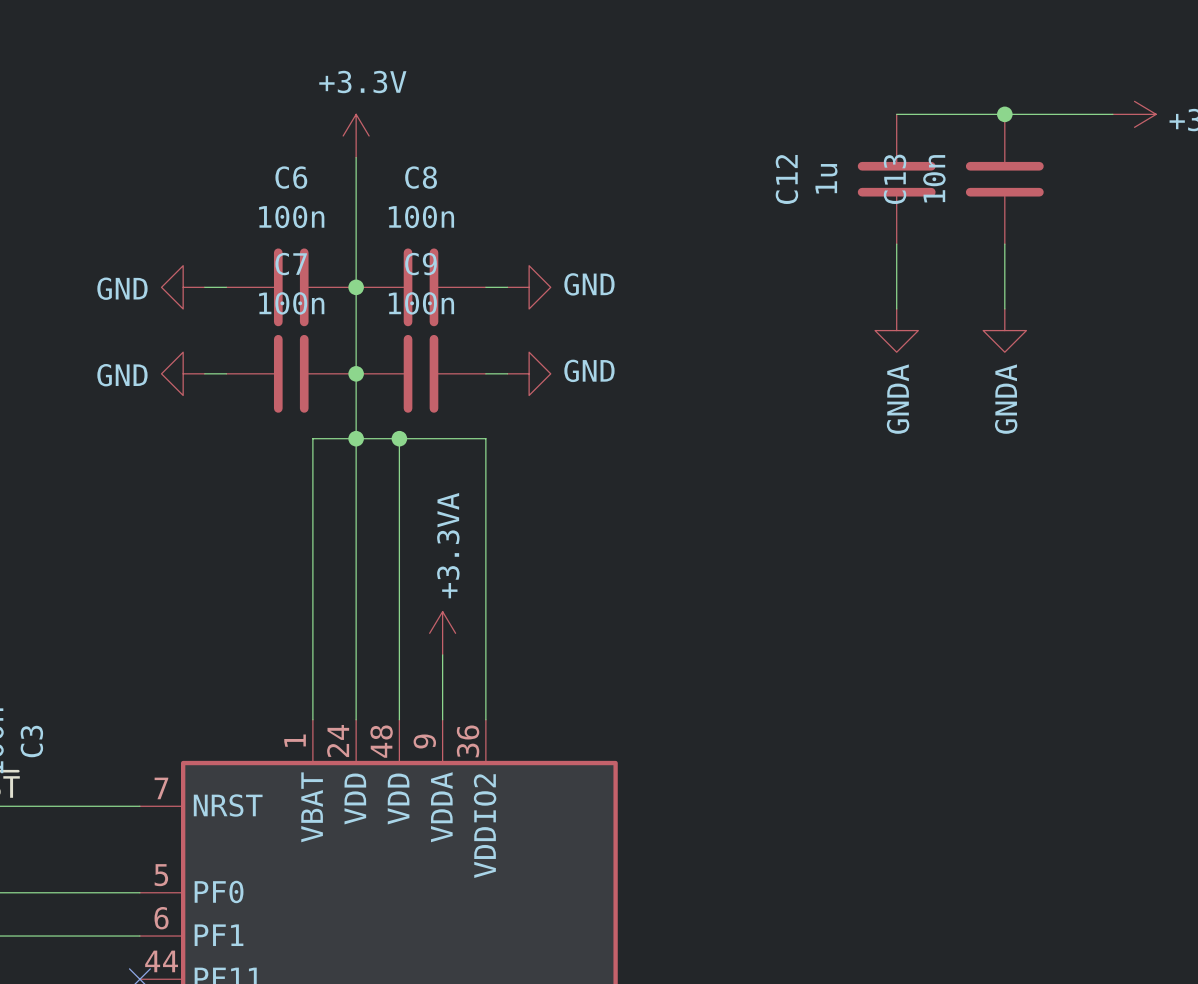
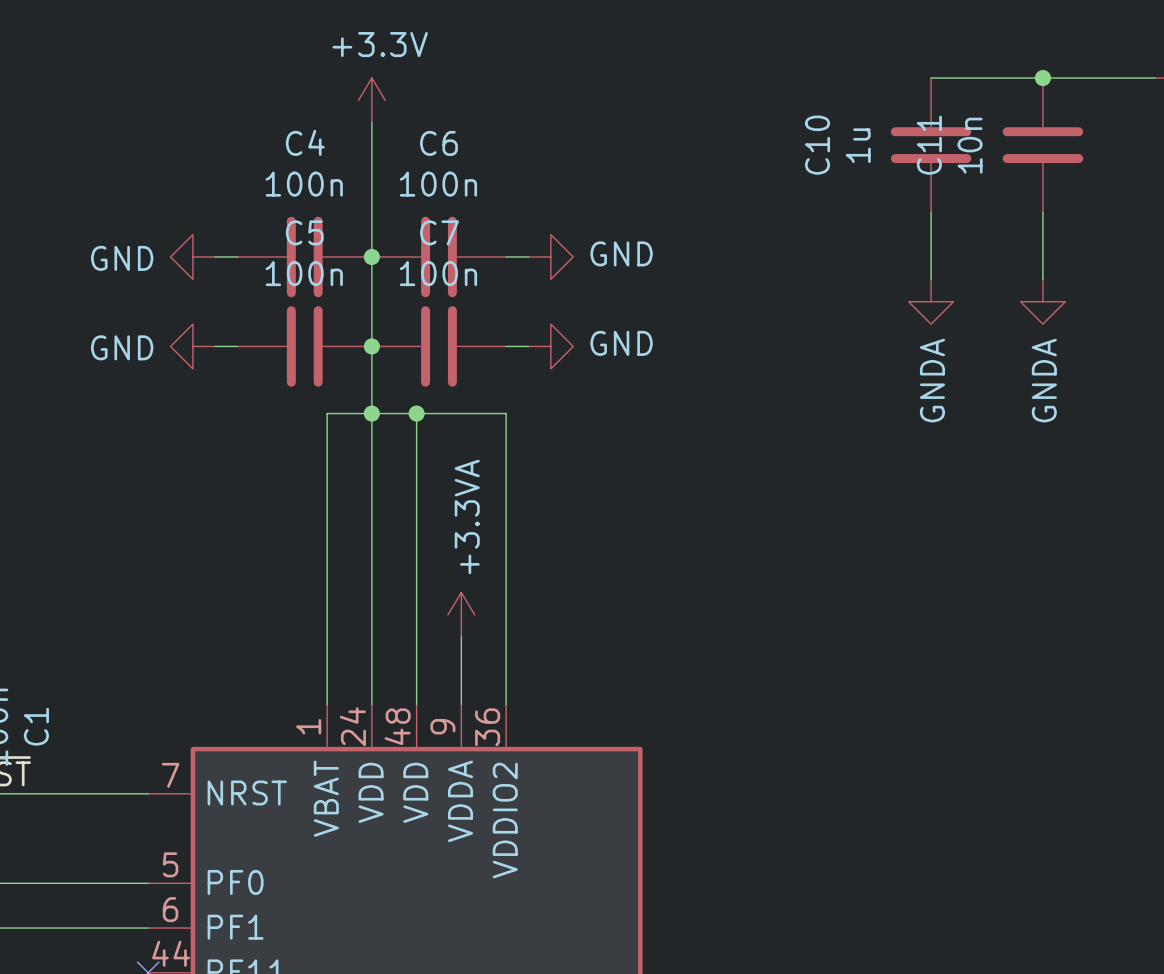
C6 name: C6 (291, 177) -> C4 (305, 142)
C8 name: C8 (421, 177) -> C6 (438, 143)
C12 name: C12 (786, 179) -> C10 (817, 145)
C13 name: C13 (895, 179) -> C11 (929, 145)
C7 name: C7 (291, 264) -> C5 (304, 232)
C9 name: C9 (421, 264) -> C7 (439, 232)
C3 name: C3 (31, 741) -> C1 (36, 726)

